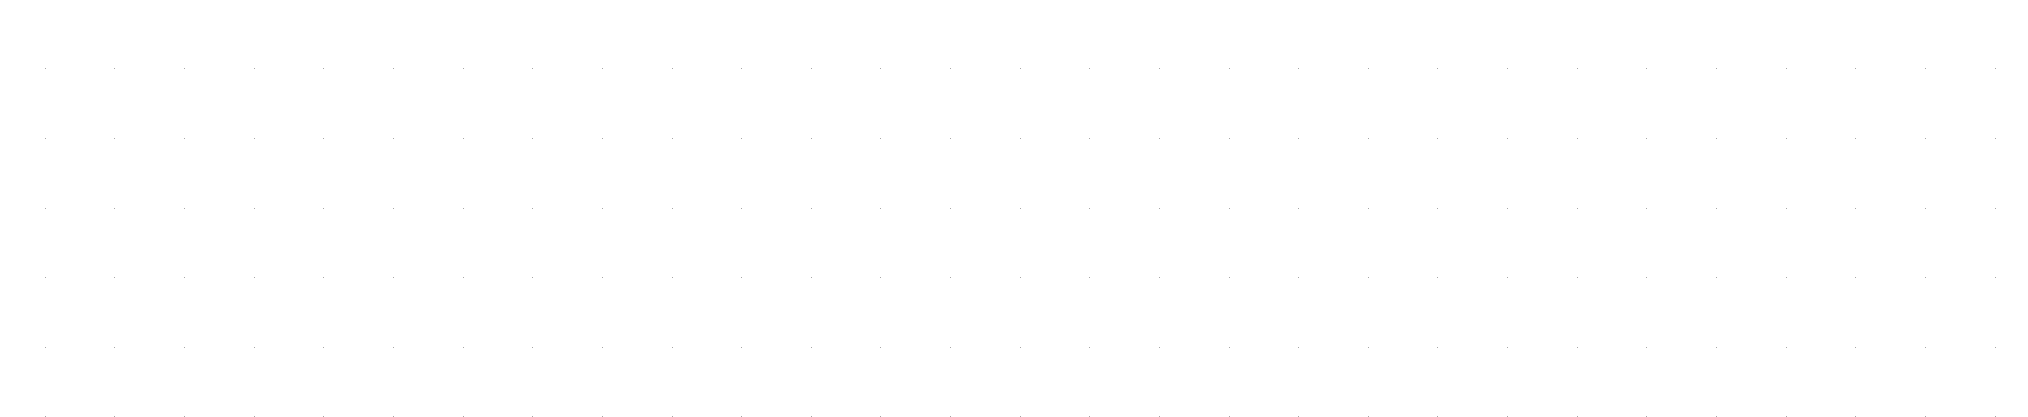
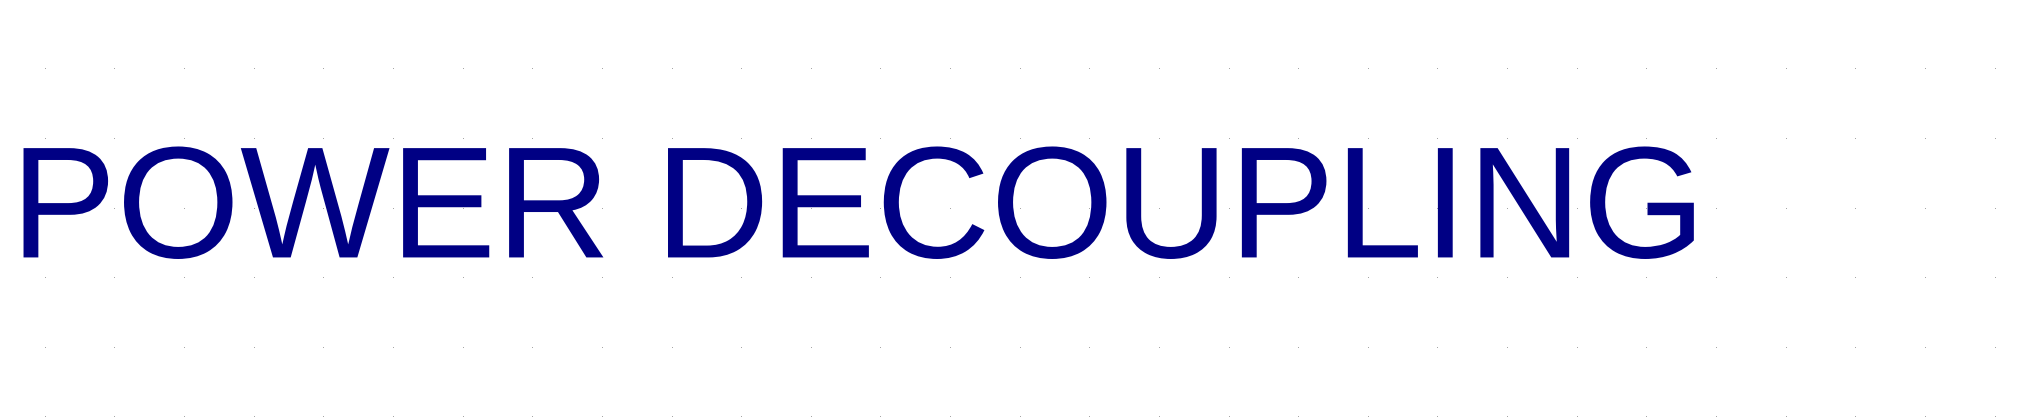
text: none -> POWER DECOUPLING (858, 202)

